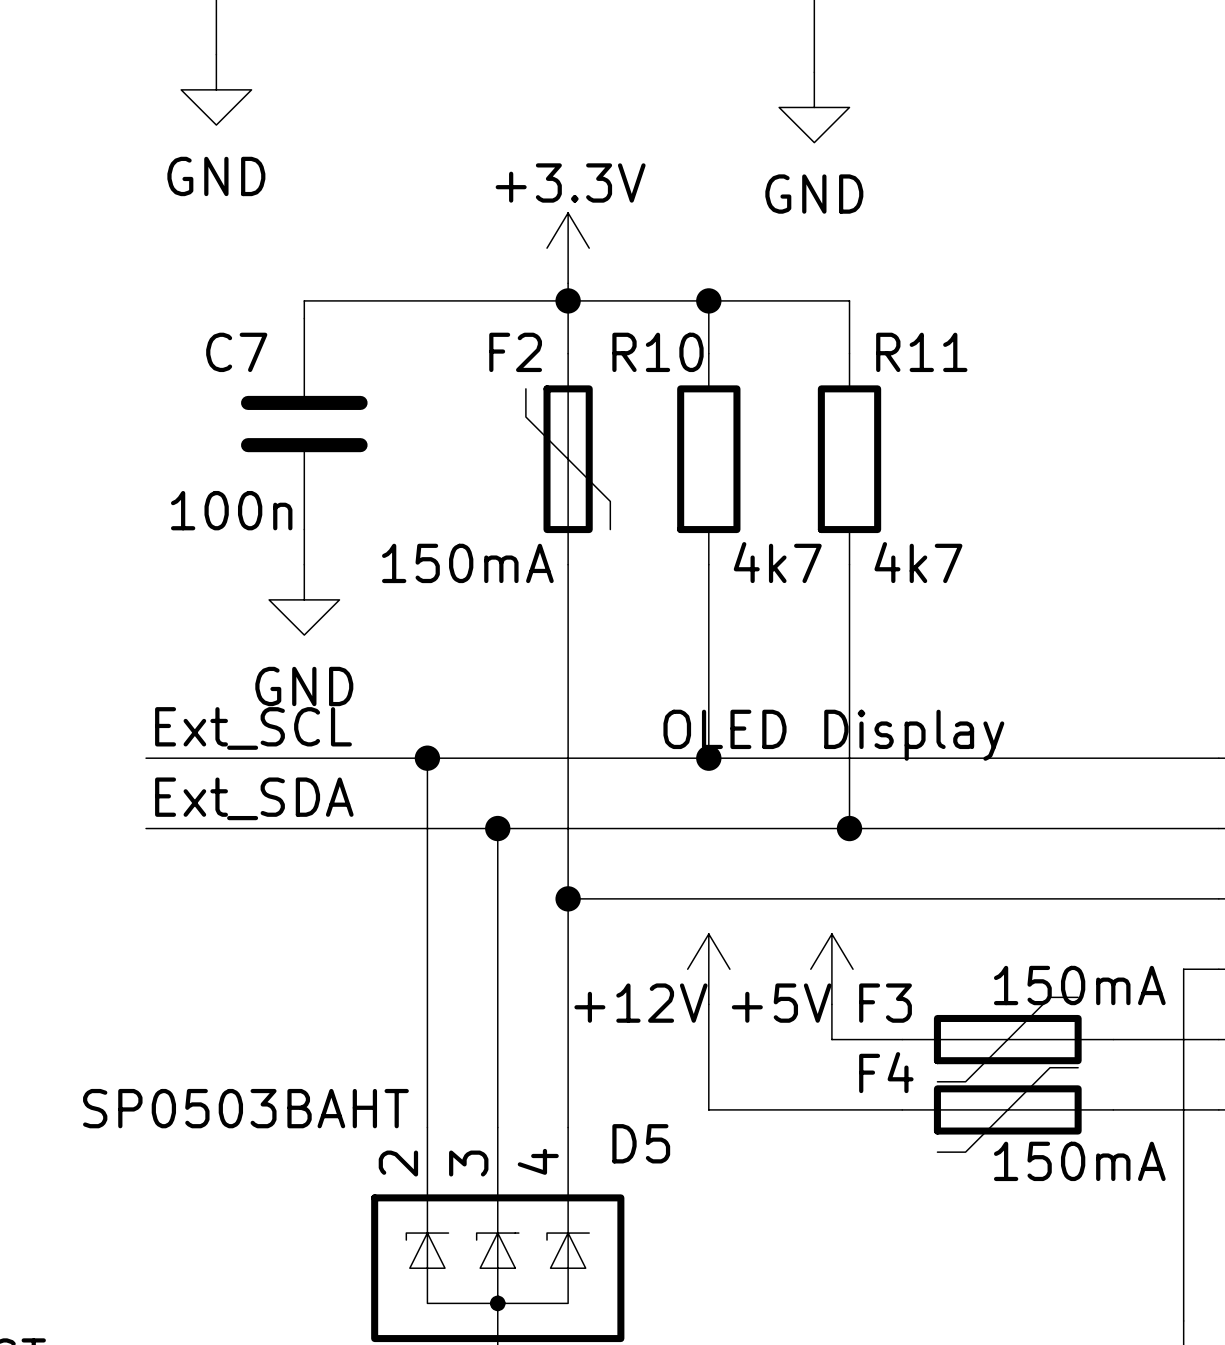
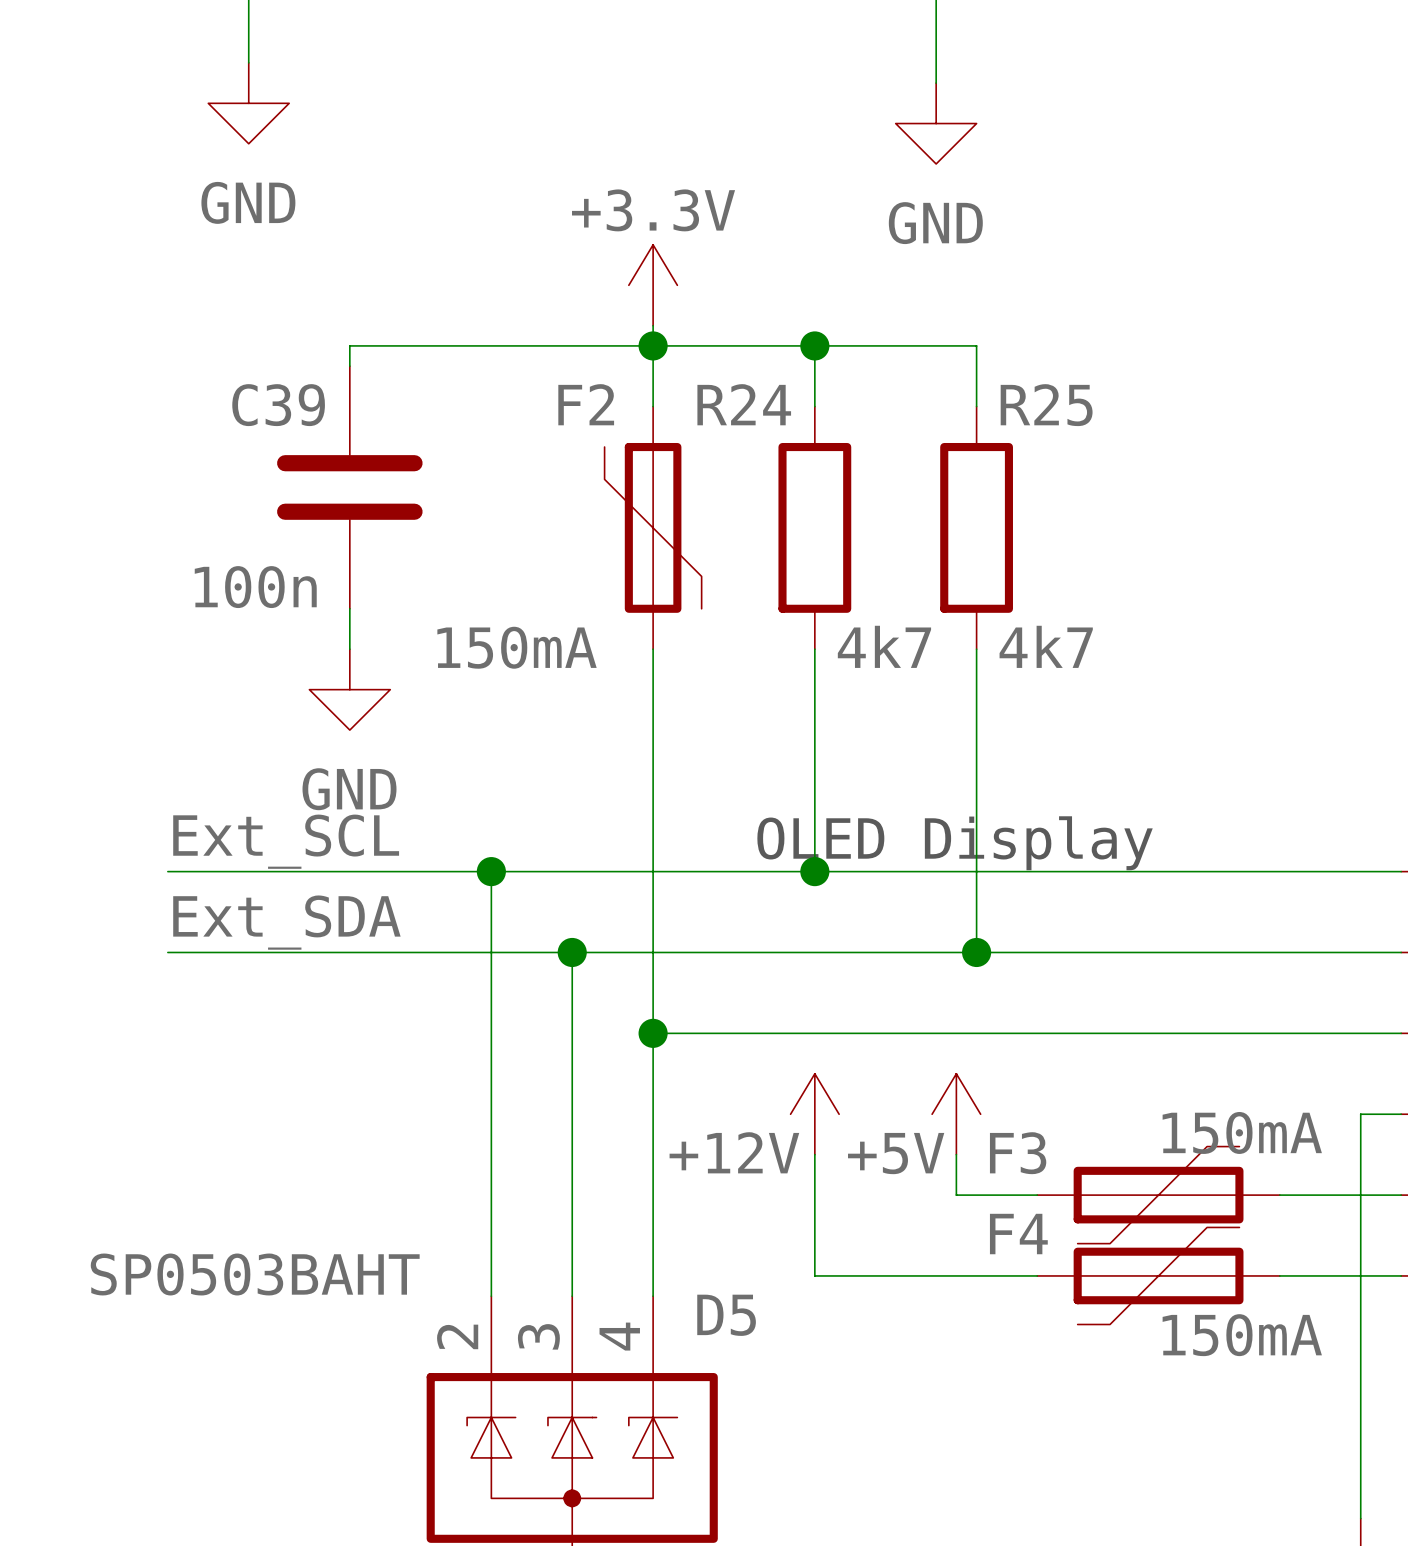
C7 name: C7 (236, 352) -> C39 (278, 405)
R10 name: R10 (657, 352) -> R24 (744, 404)
R11 name: R11 (921, 352) -> R25 (1046, 405)

